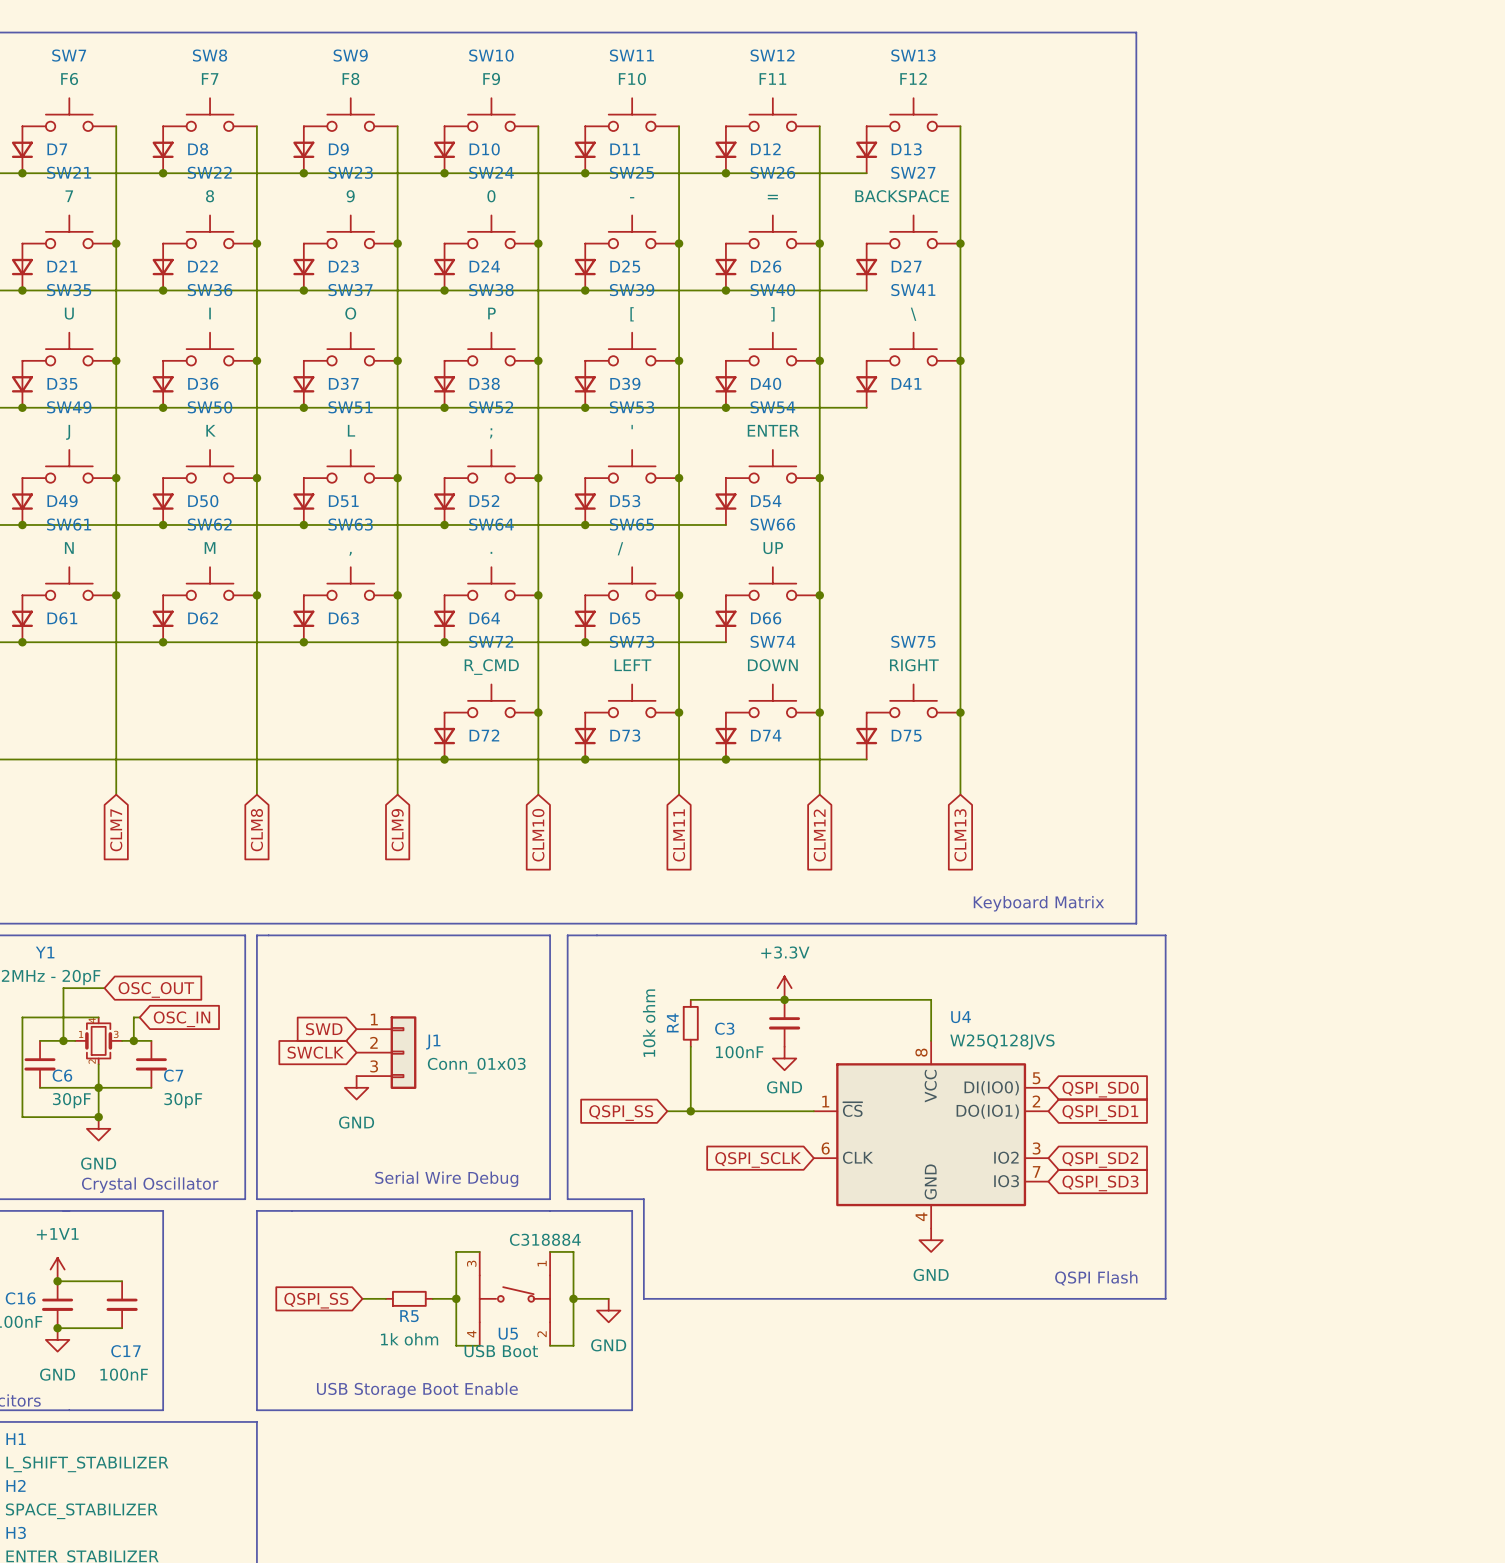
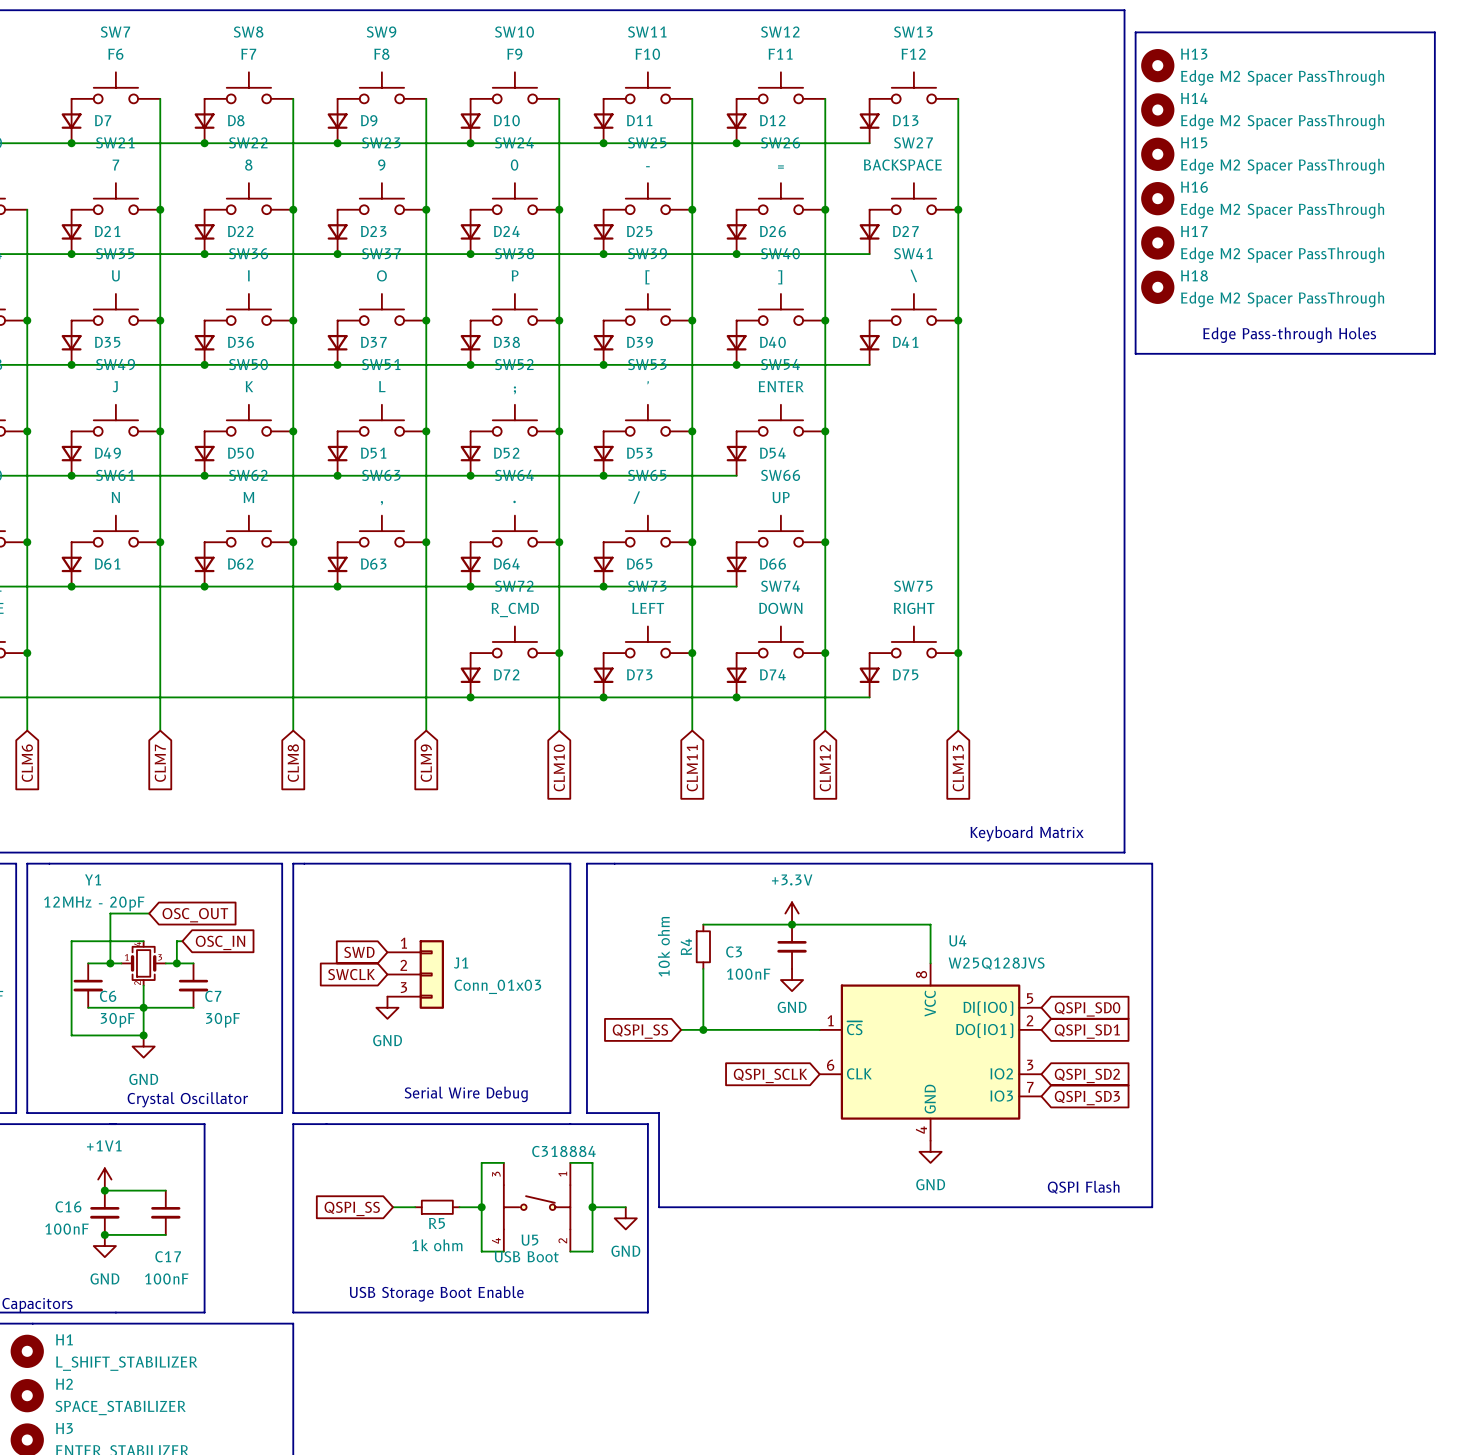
line: none -> (1135, 32) (1434, 32) (1434, 353) (1135, 353) (1135, 32)
H13: none -> Edge M2 Spacer PassThrough (1157, 65)
H14: none -> Edge M2 Spacer PassThrough (1157, 109)
H15: none -> Edge M2 Spacer PassThrough (1157, 154)
H16: none -> Edge M2 Spacer PassThrough (1157, 198)
H17: none -> Edge M2 Spacer PassThrough (1157, 242)
H18: none -> Edge M2 Spacer PassThrough (1157, 287)
text: none -> Edge Pass-through Holes (1289, 335)

